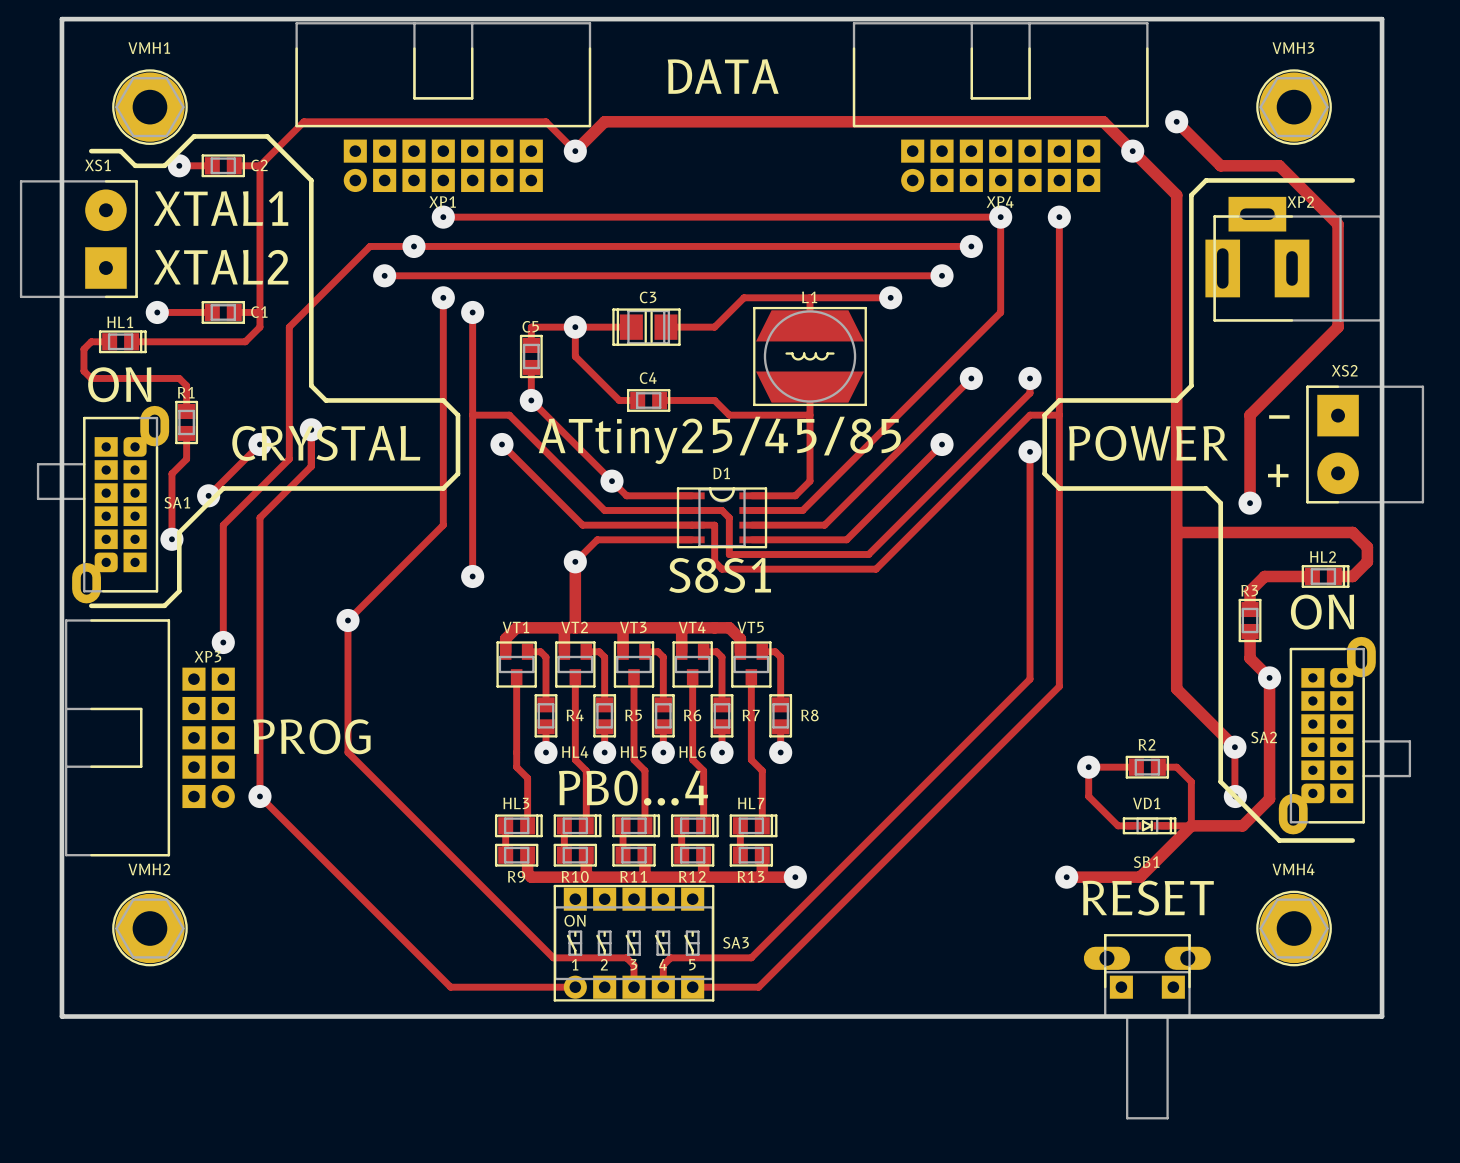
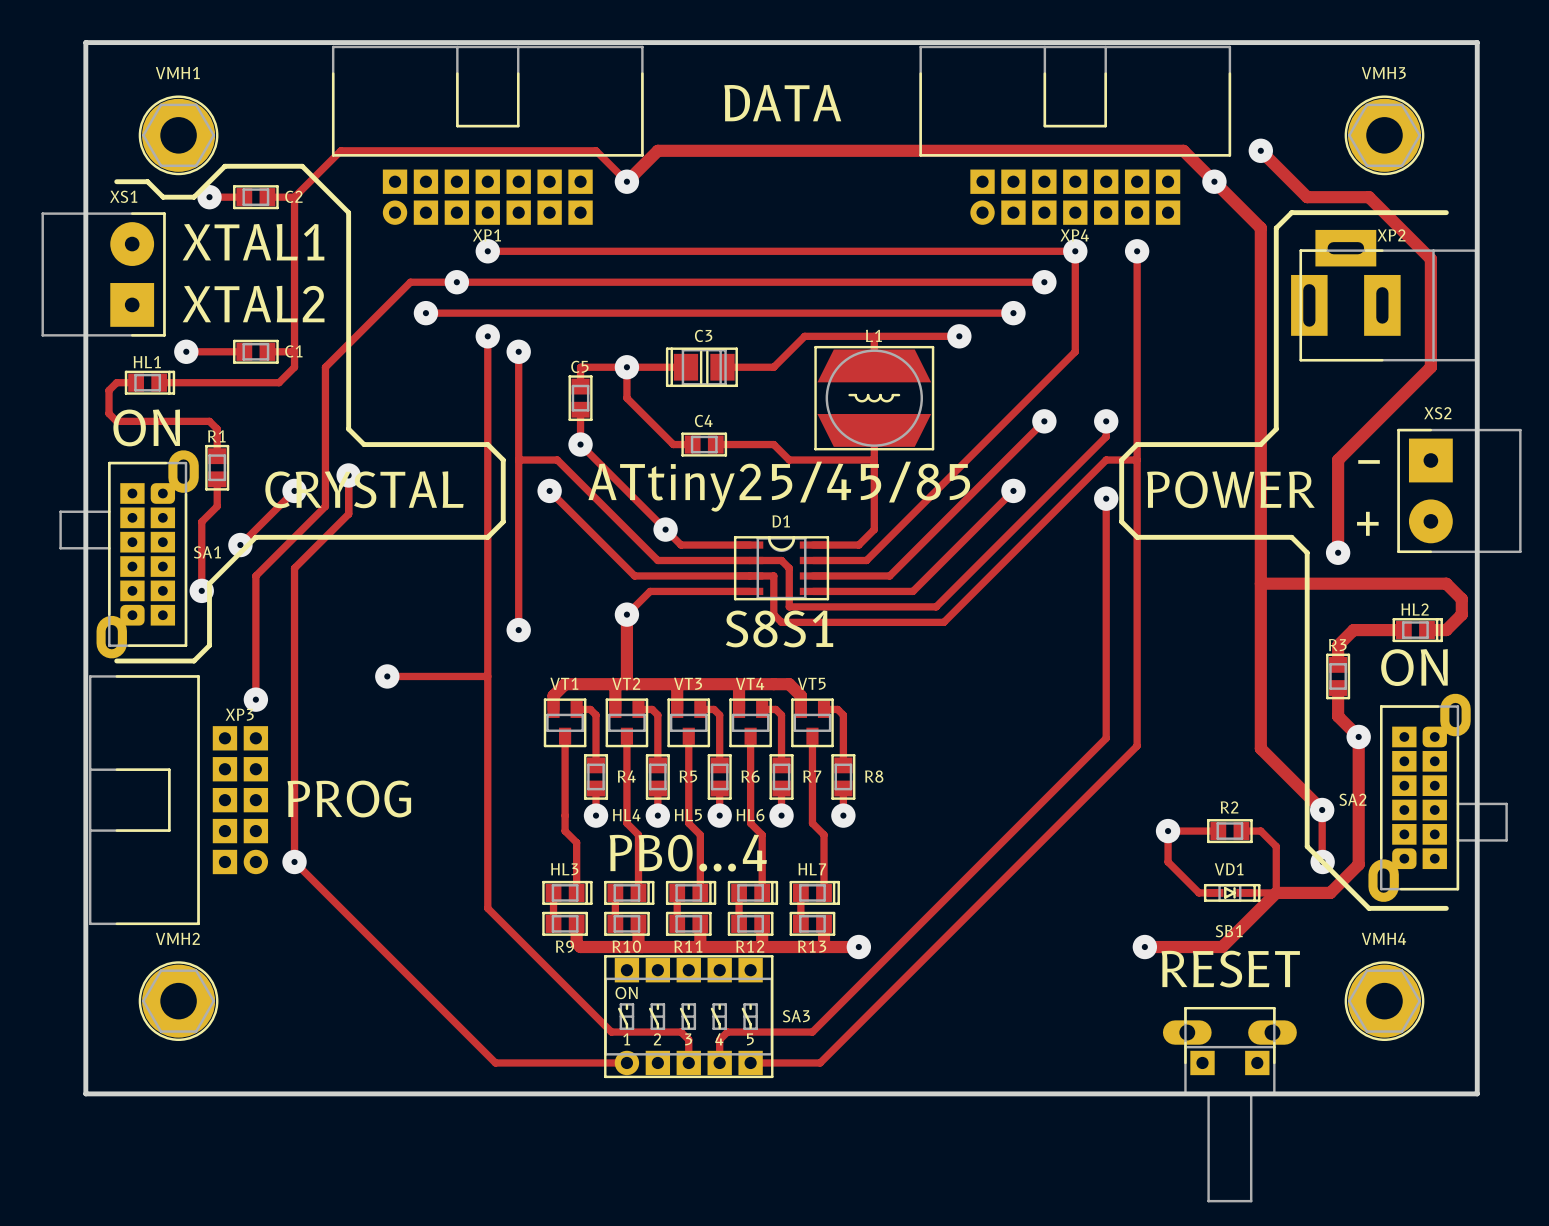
track: (443, 525) (347, 620) (347, 752) (553, 957) (560, 957) -> (487, 575) (487, 908) (611, 1032)
track: none -> (387, 676) (487, 676)

